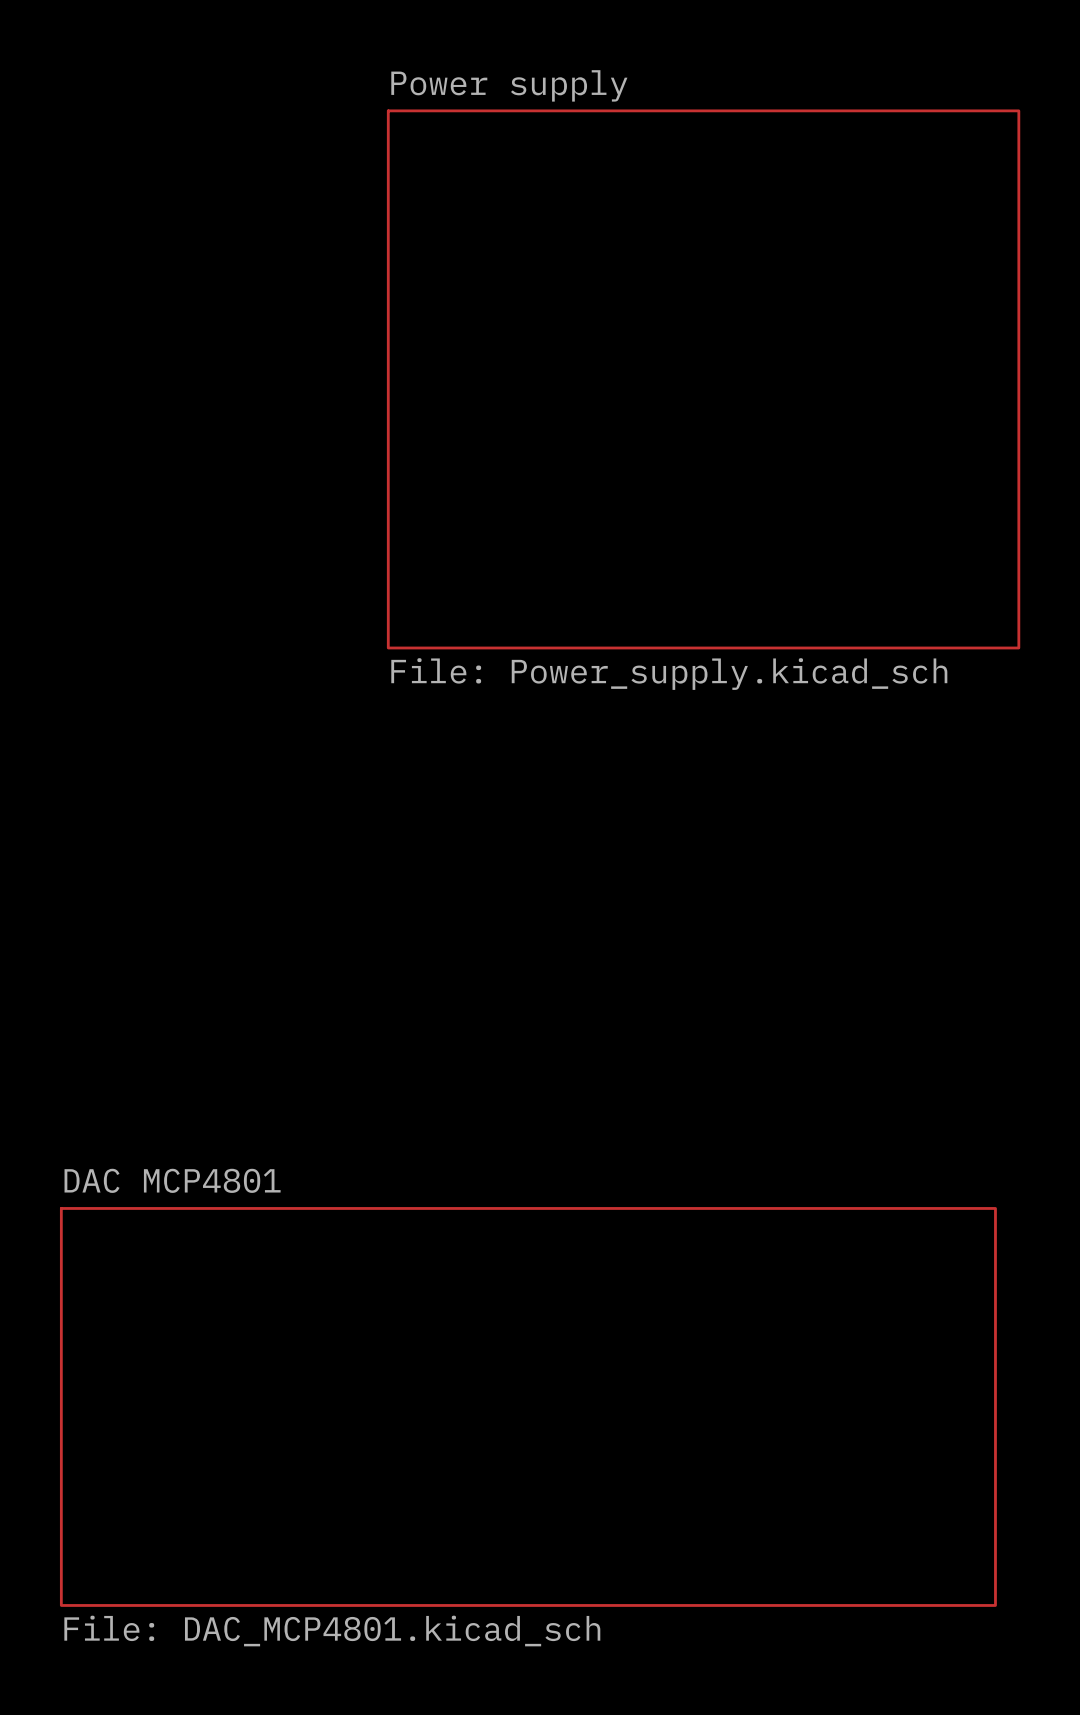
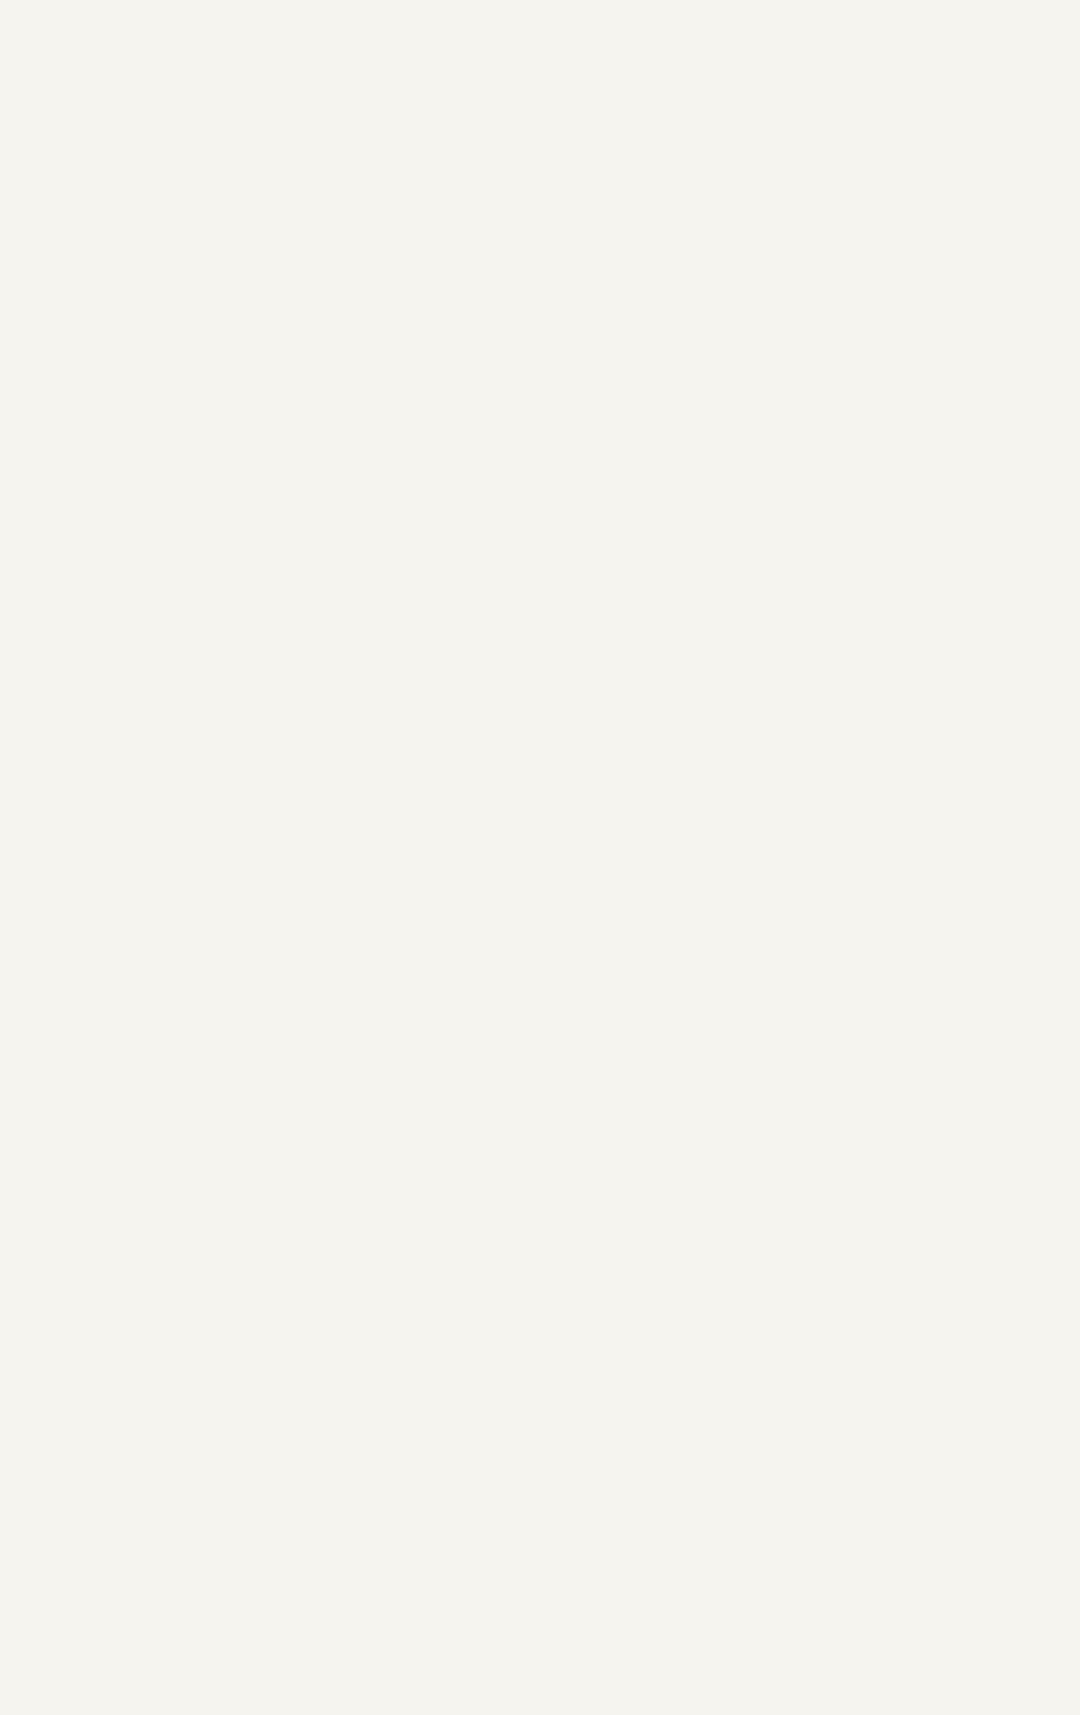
sheet Power supply: File: Power_supply.kicad_sch (703, 379) -> none
sheet DAC MCP4801: File: DAC_MCP4801.kicad_sch (528, 1406) -> none

